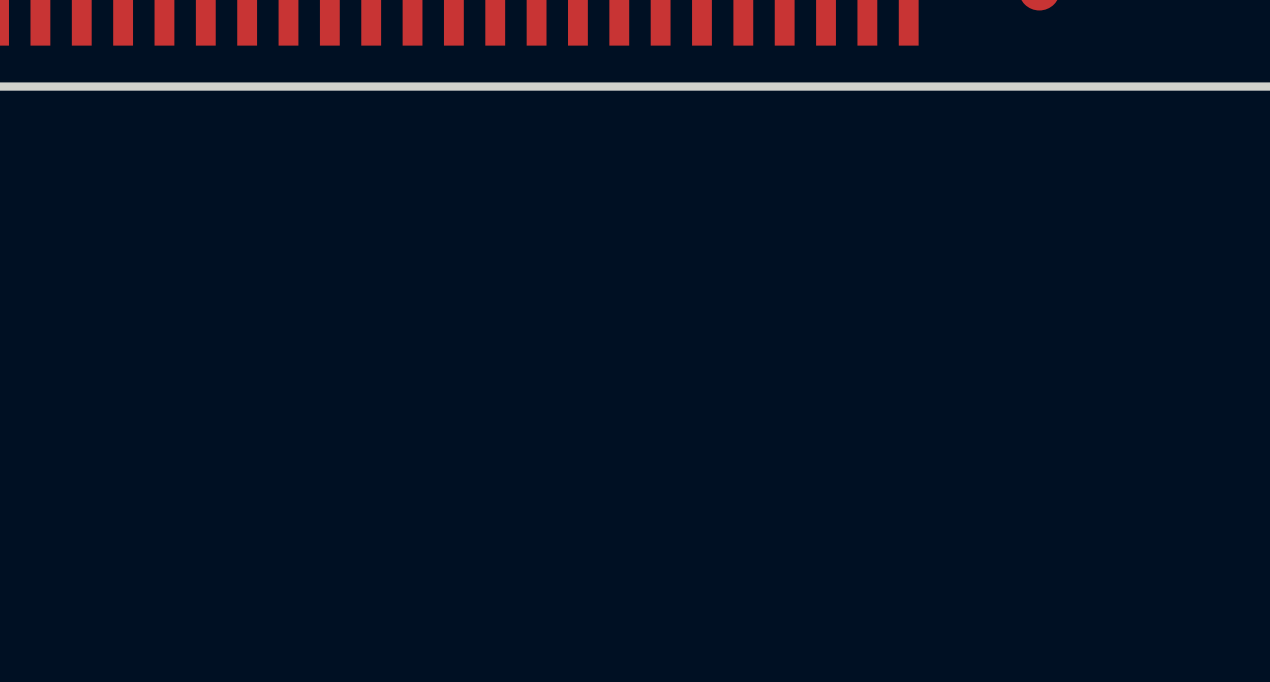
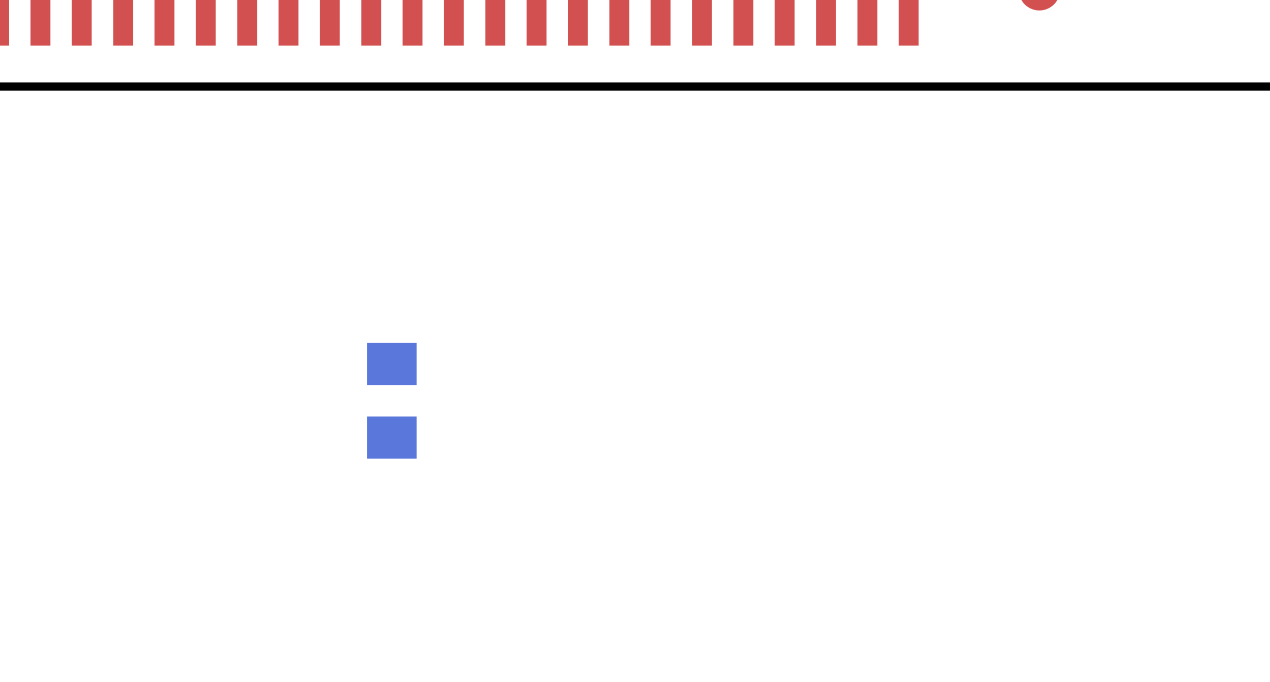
part: none -> (391, 400)

